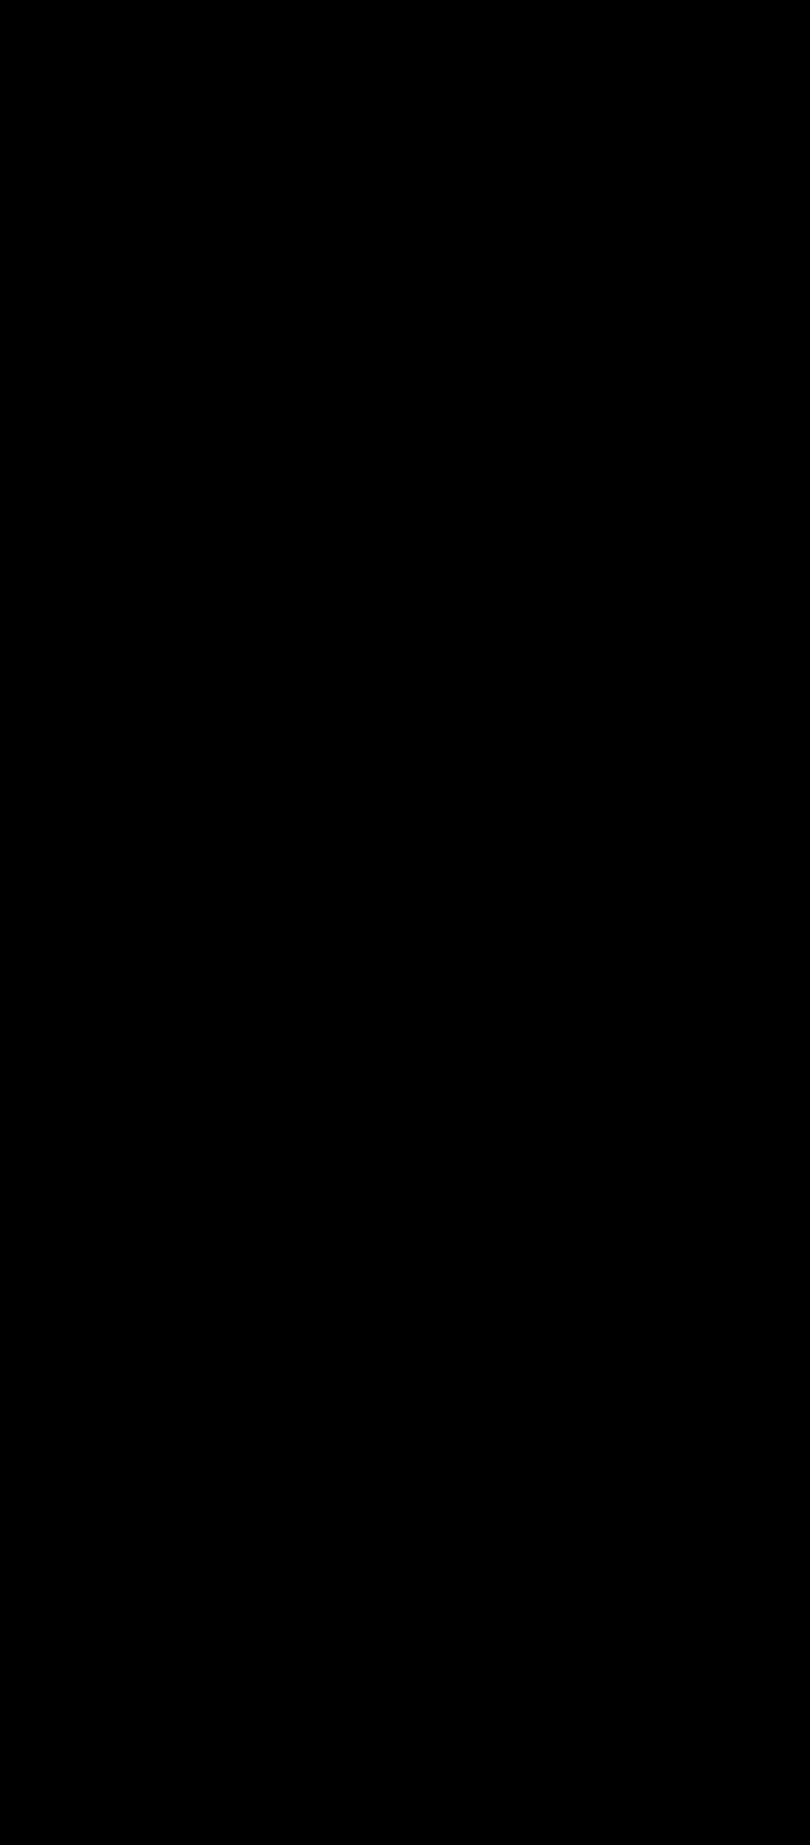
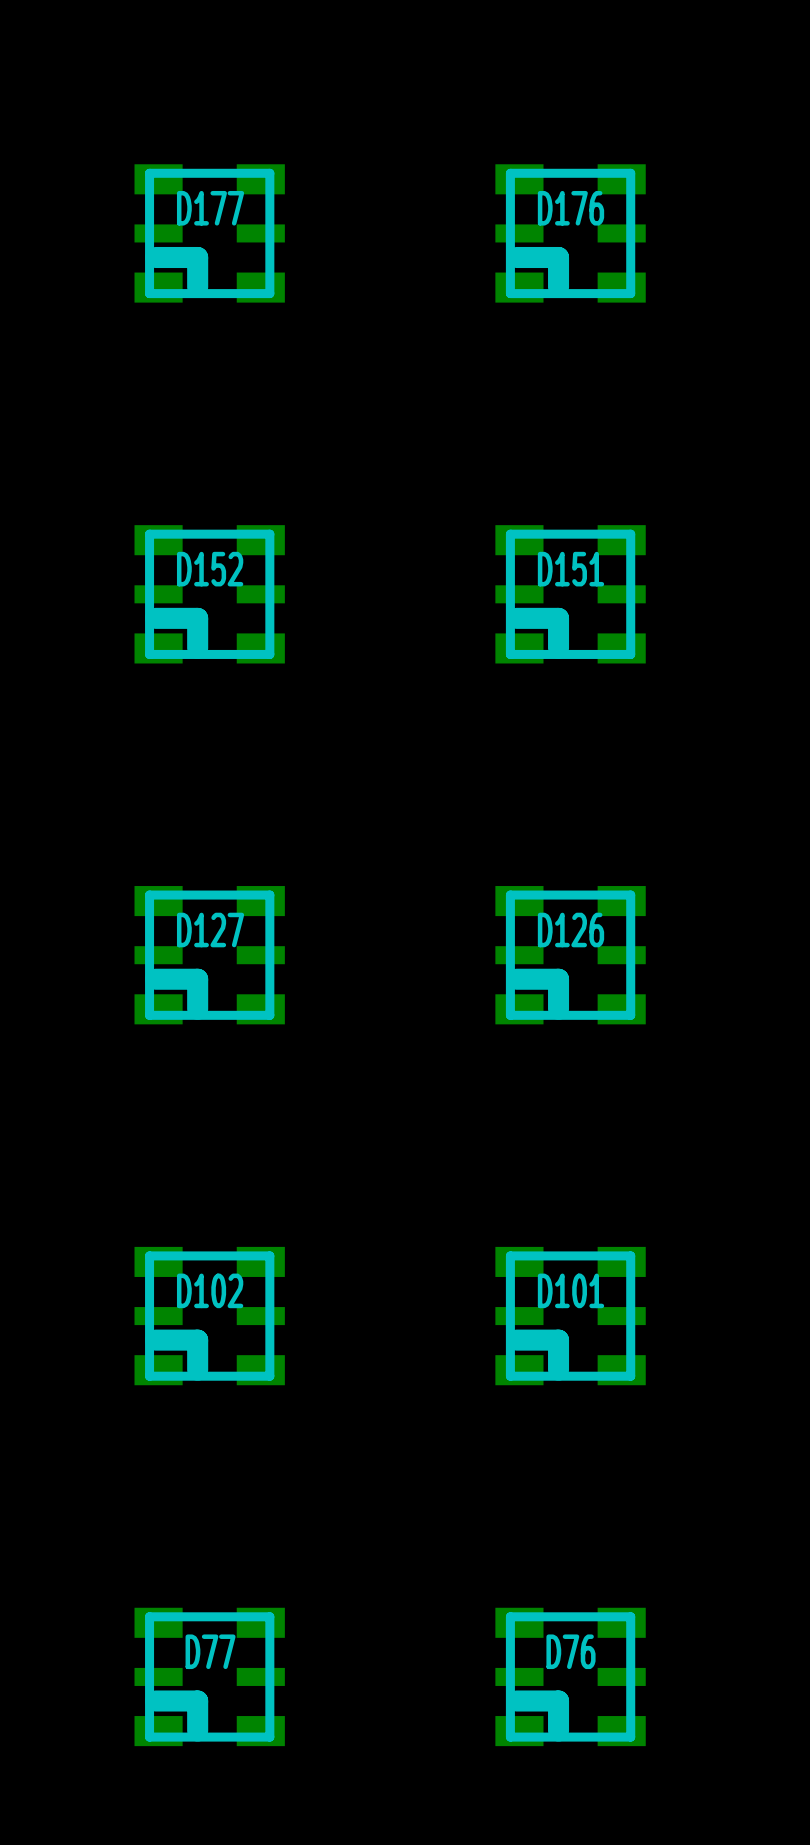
D177: none -> (209, 233)
D176: none -> (570, 233)
D152: none -> (209, 594)
D151: none -> (570, 594)
D127: none -> (209, 955)
D126: none -> (570, 955)
D102: none -> (209, 1316)
D101: none -> (570, 1316)
D77: none -> (209, 1676)
D76: none -> (570, 1676)

